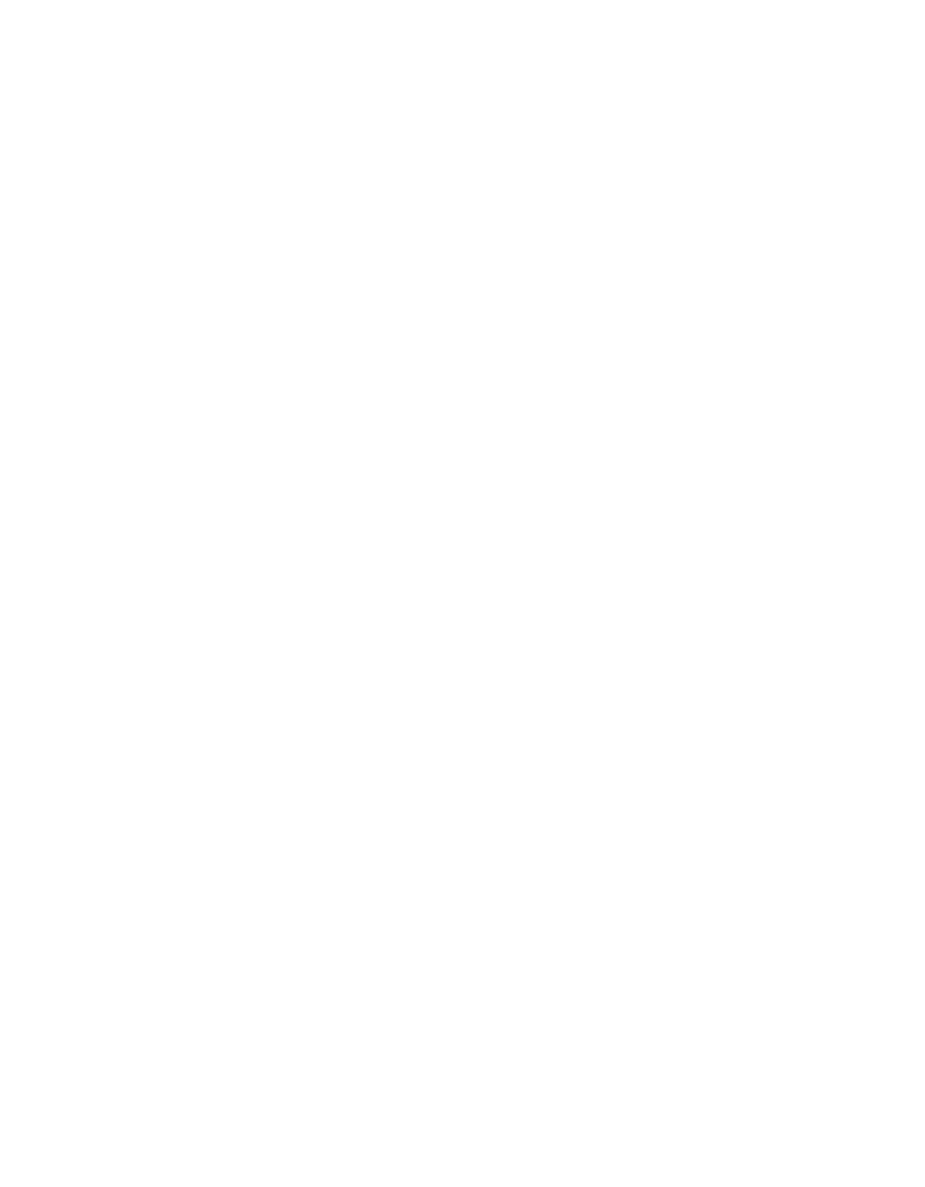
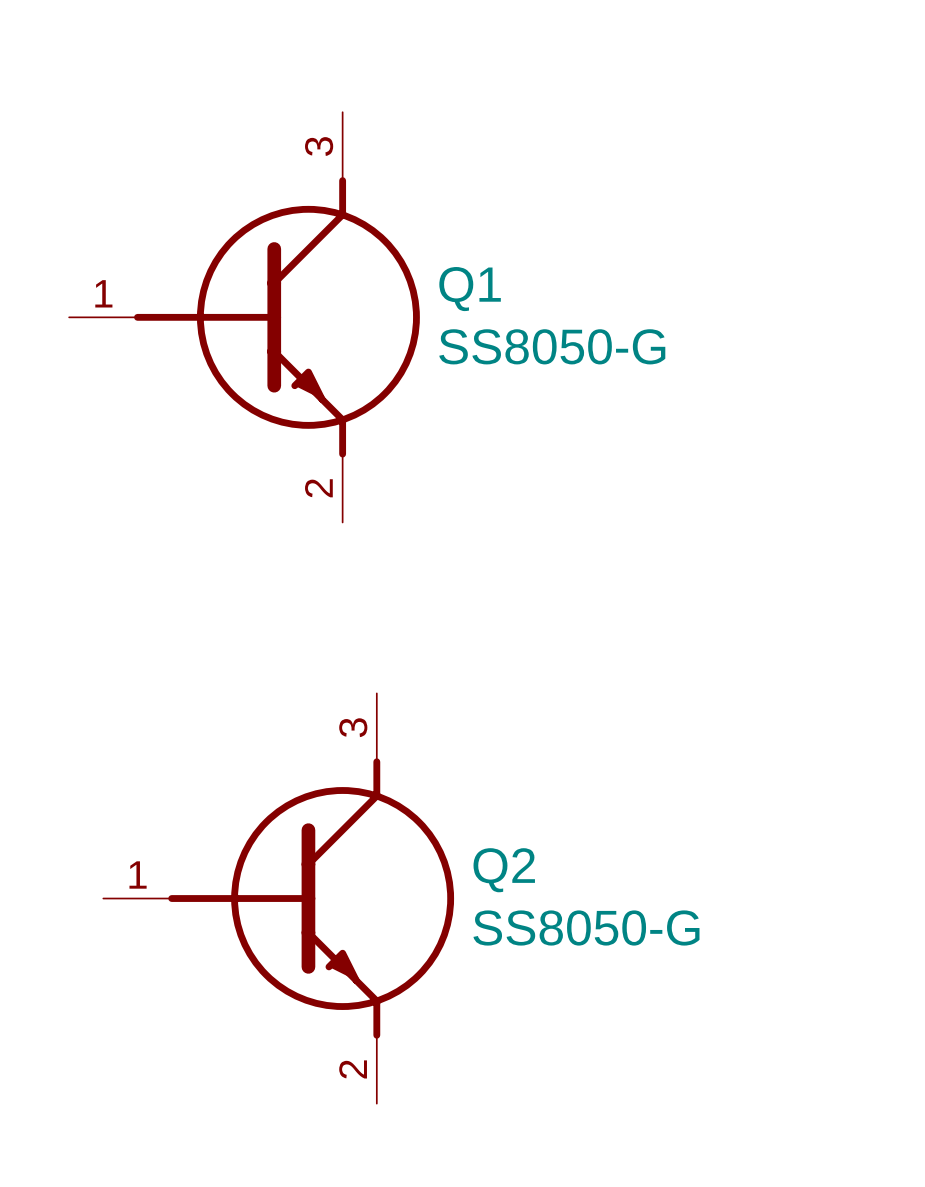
Q1: none -> SS8050-G (244, 317)
Q2: none -> SS8050-G (278, 898)

